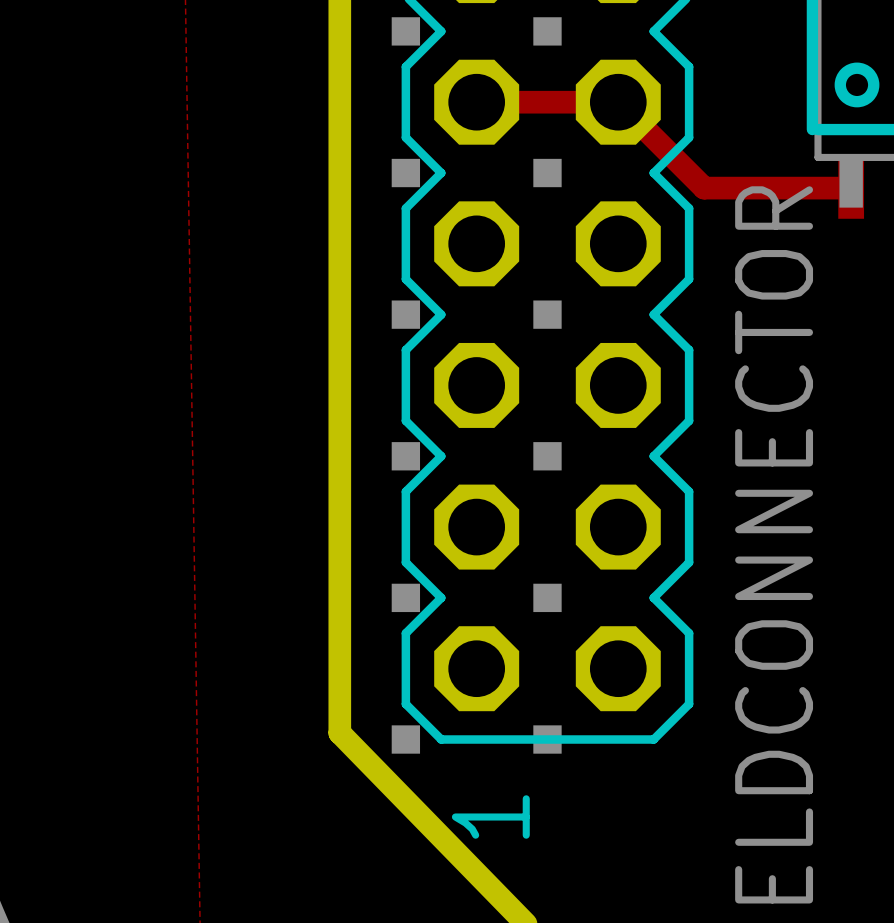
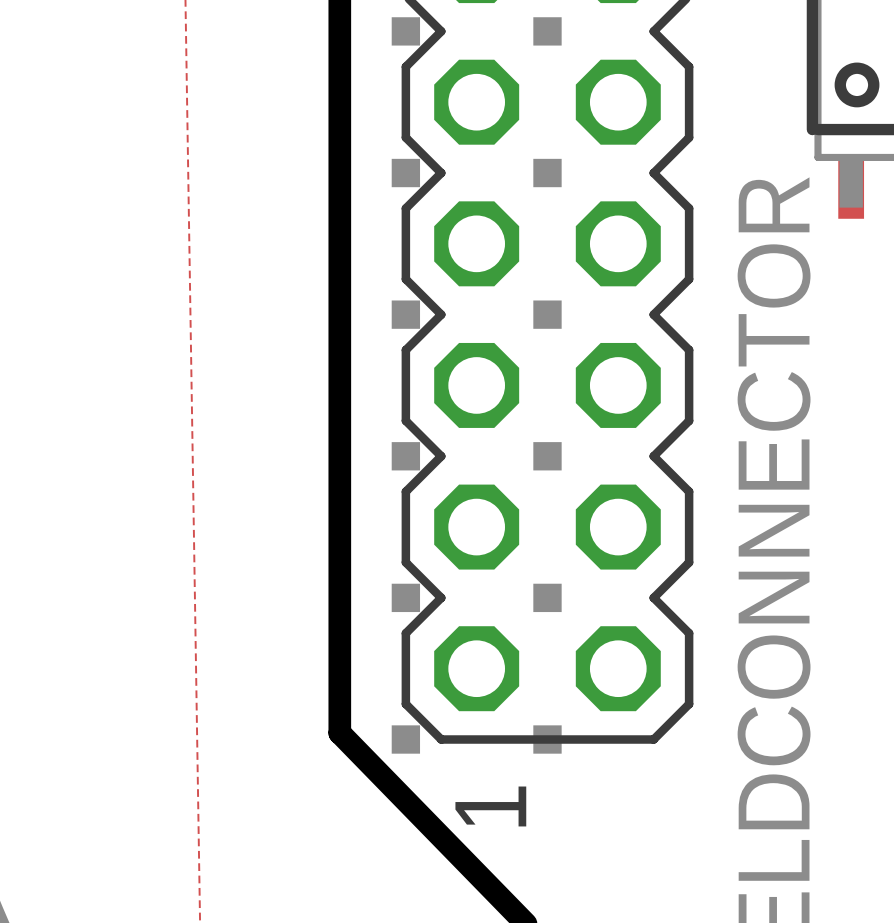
track: (476, 102) (618, 102) (704, 188) (851, 188) -> none

